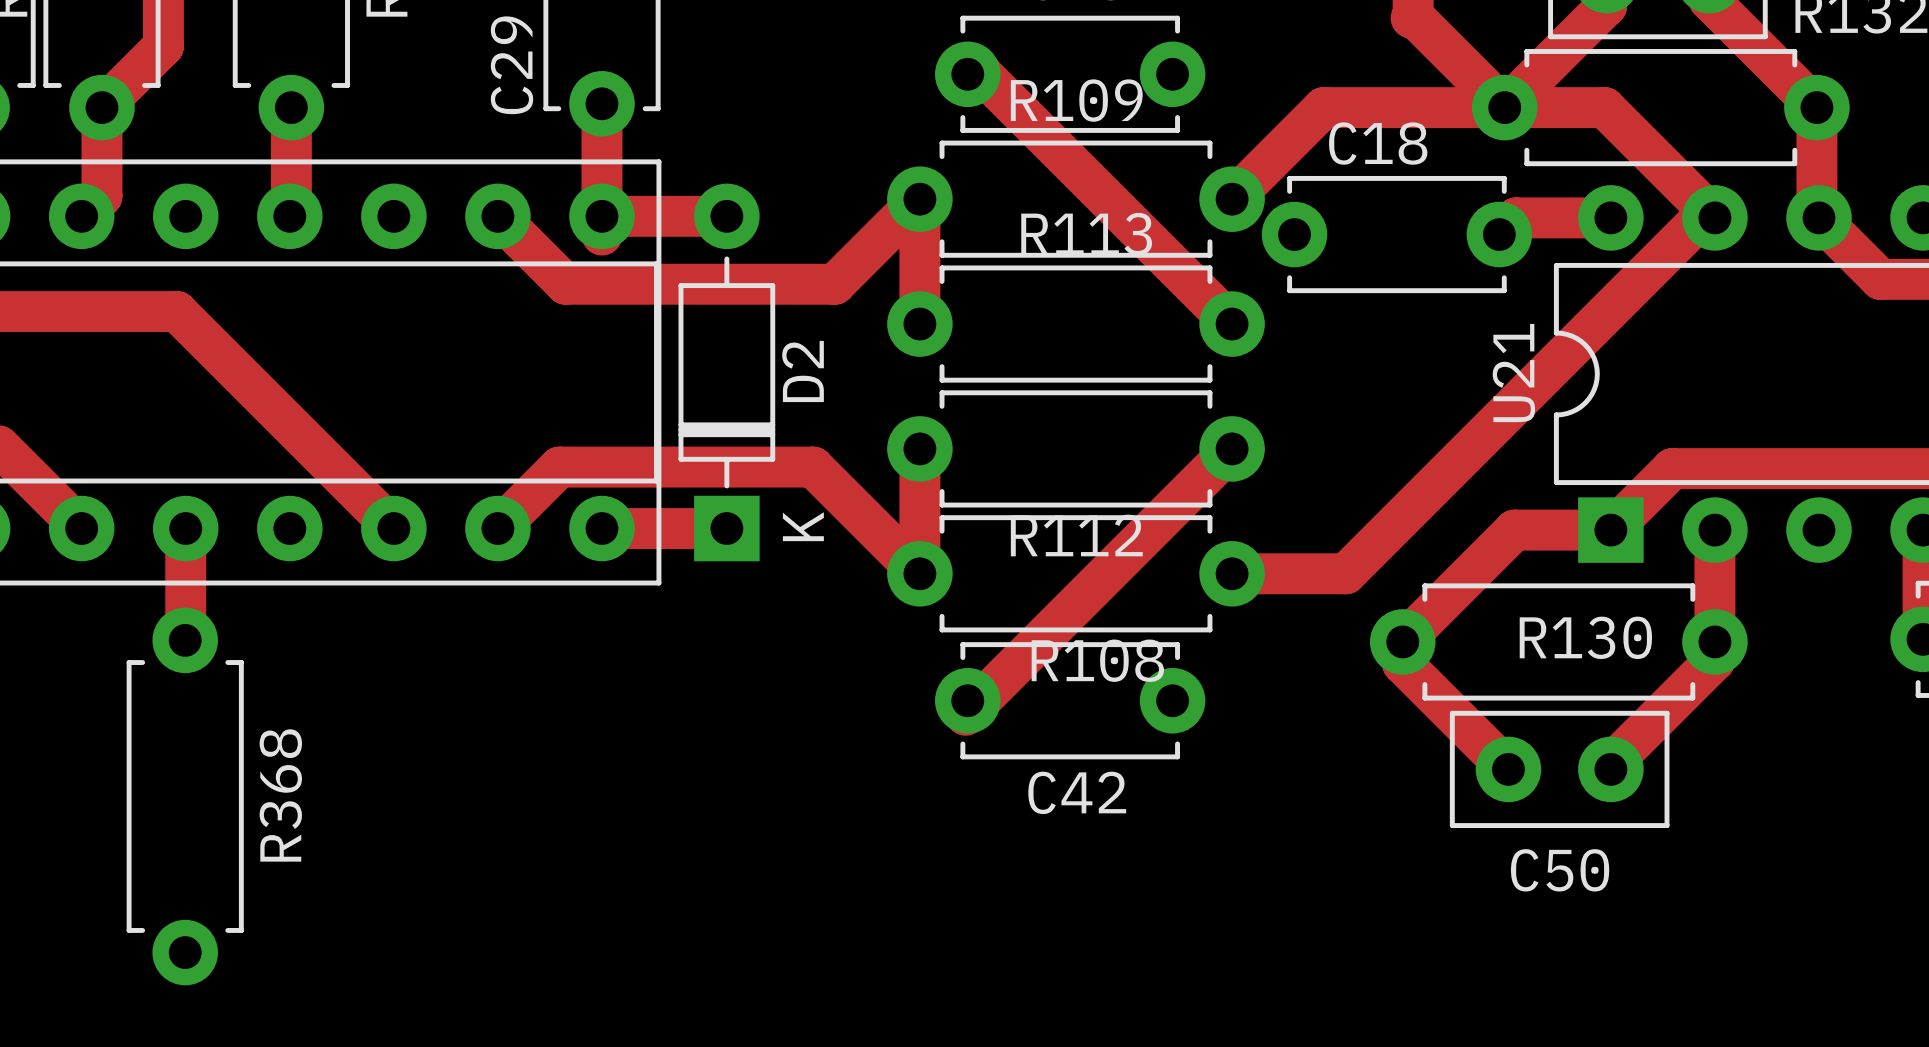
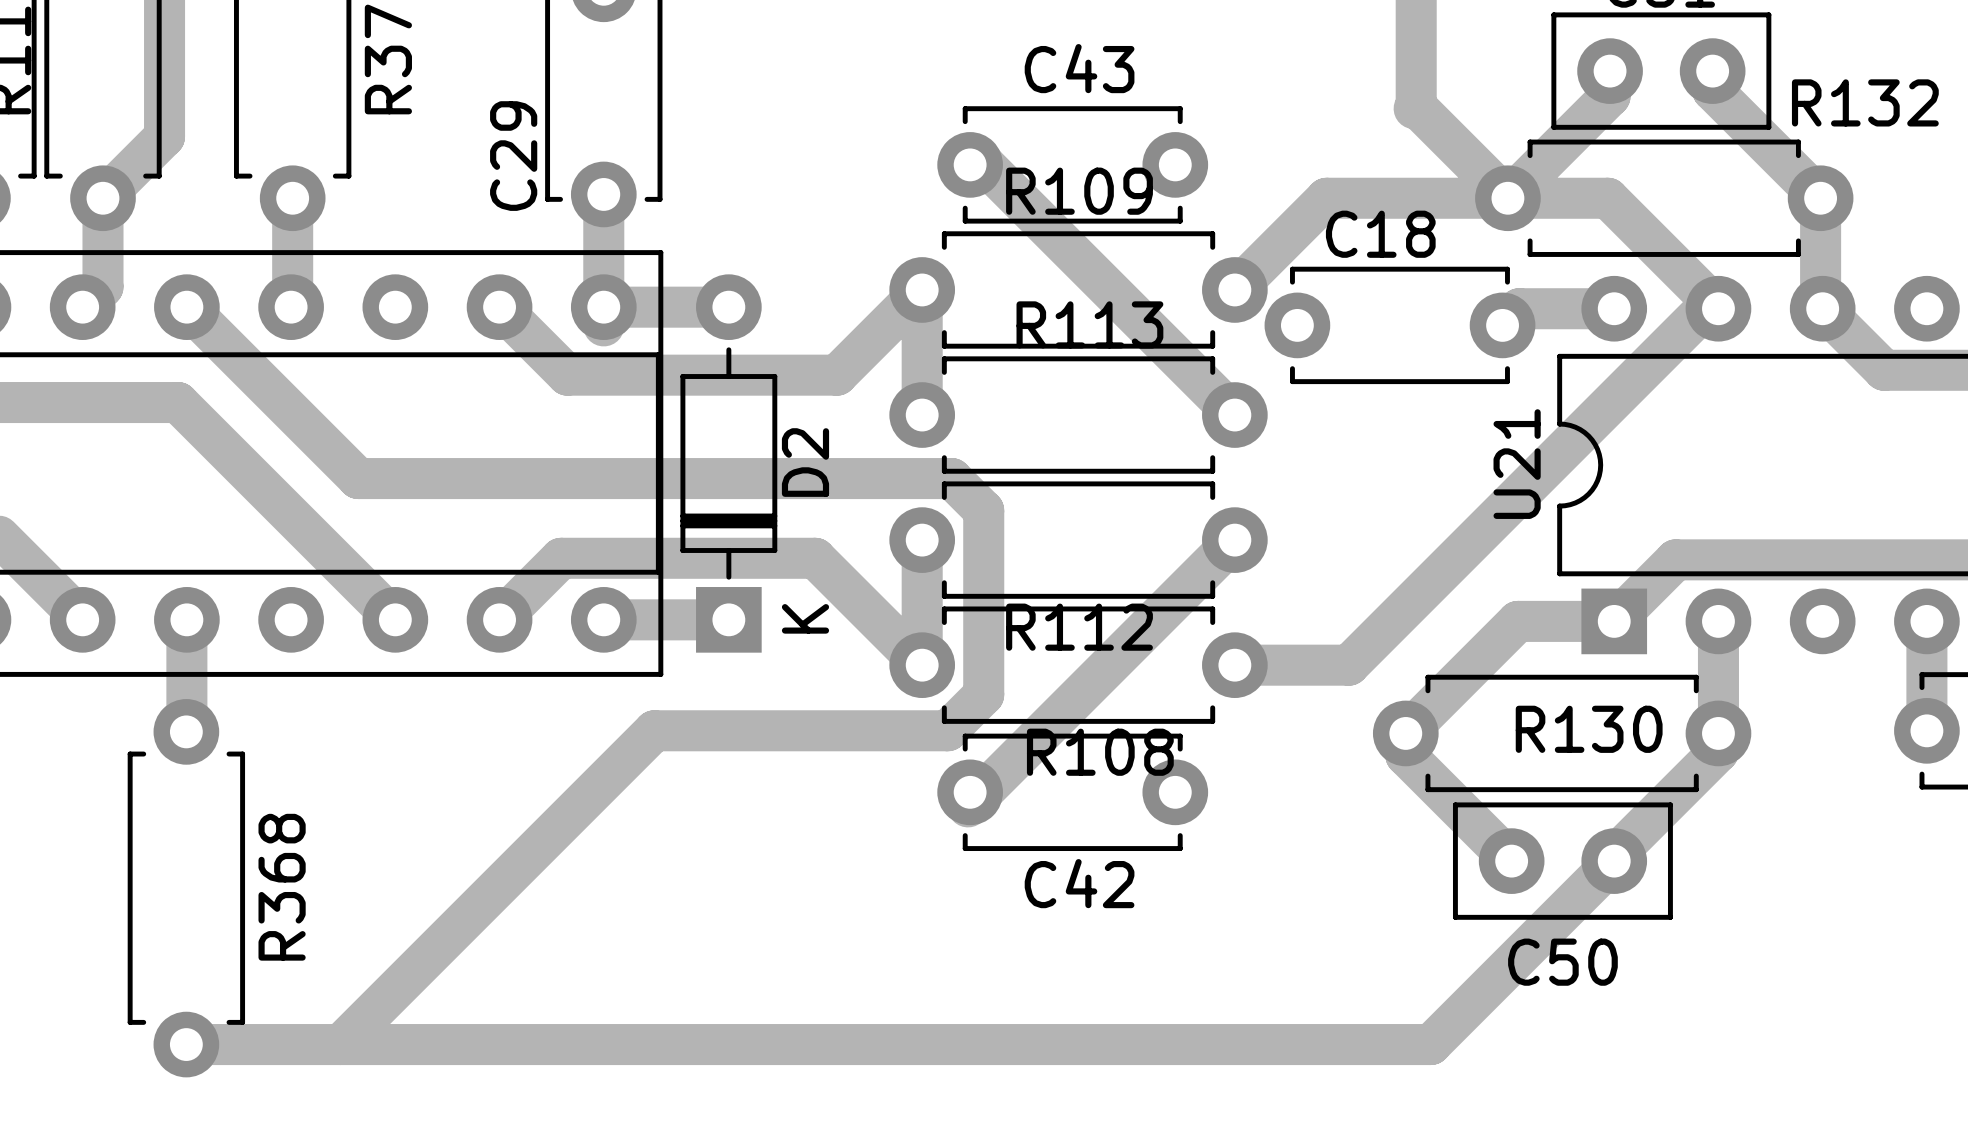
track: none -> (186, 307) (358, 478) (951, 478) (983, 510) (983, 694) (947, 730) (654, 730) (340, 1044)
track: none -> (1614, 861) (1430, 1044) (186, 1044)

